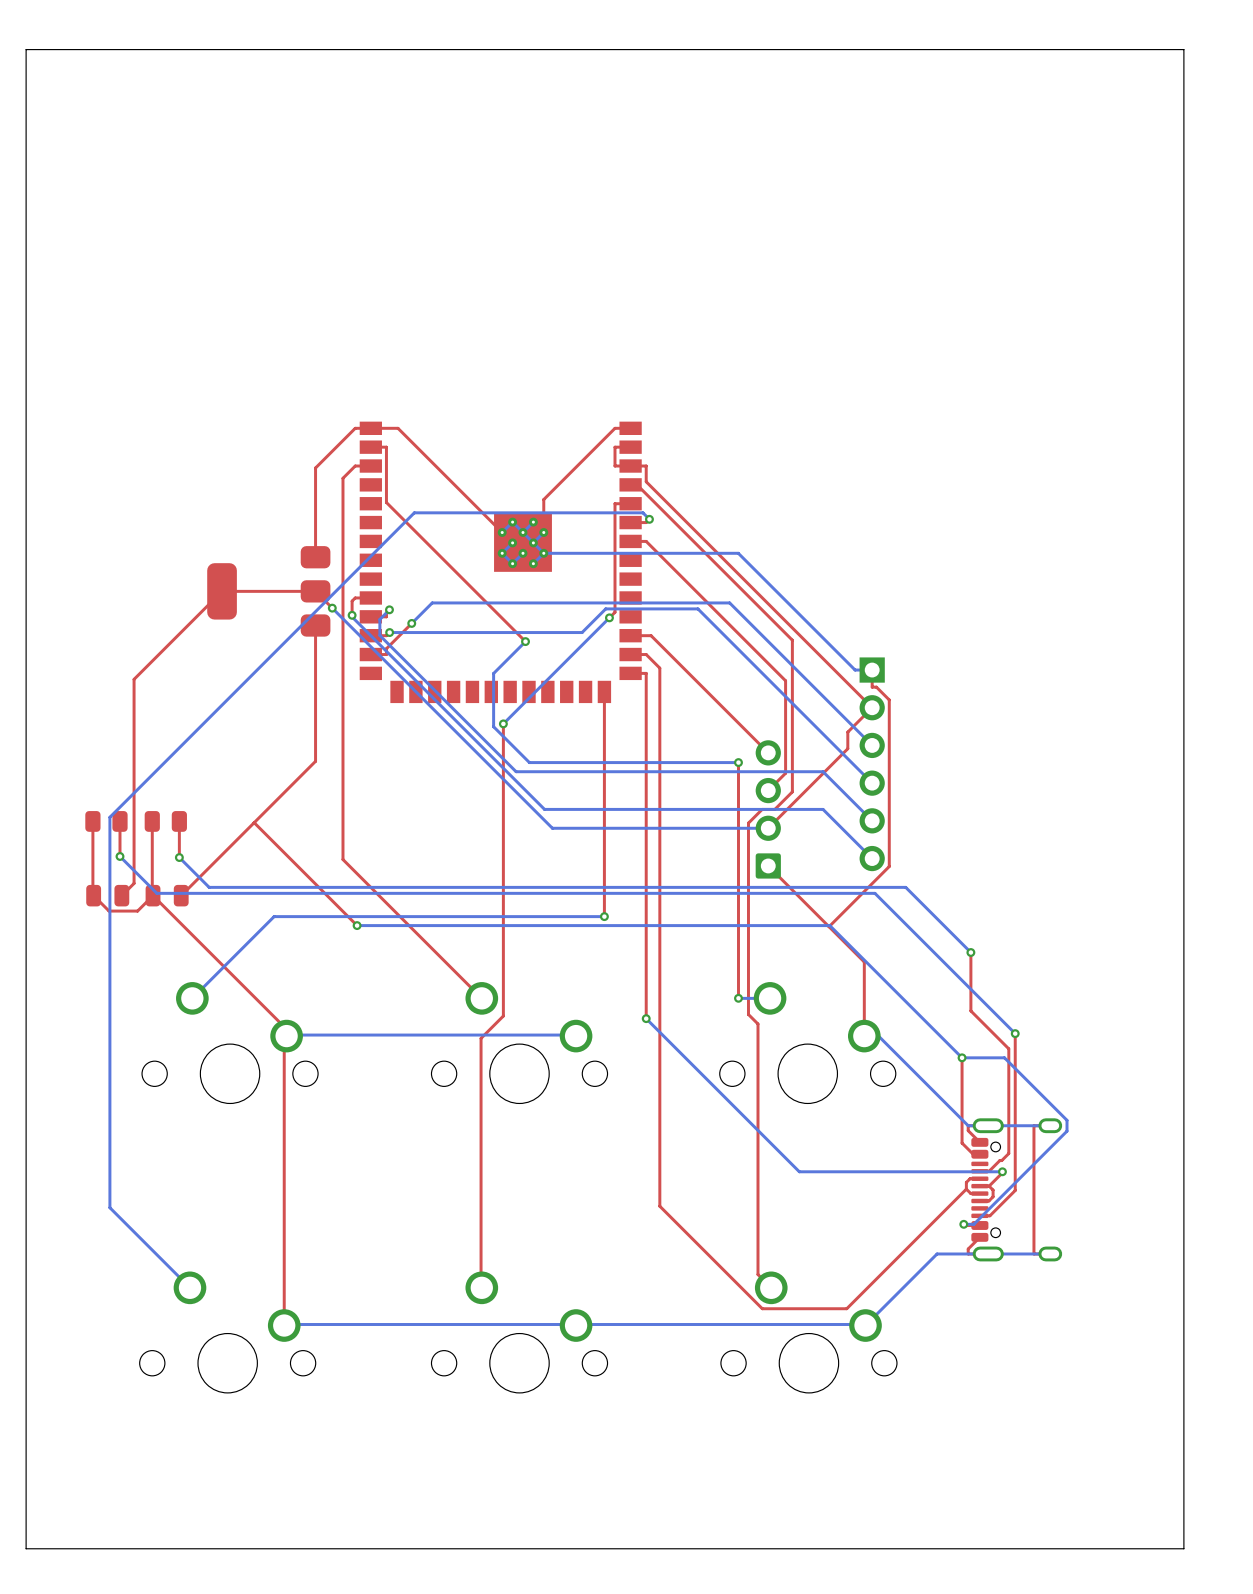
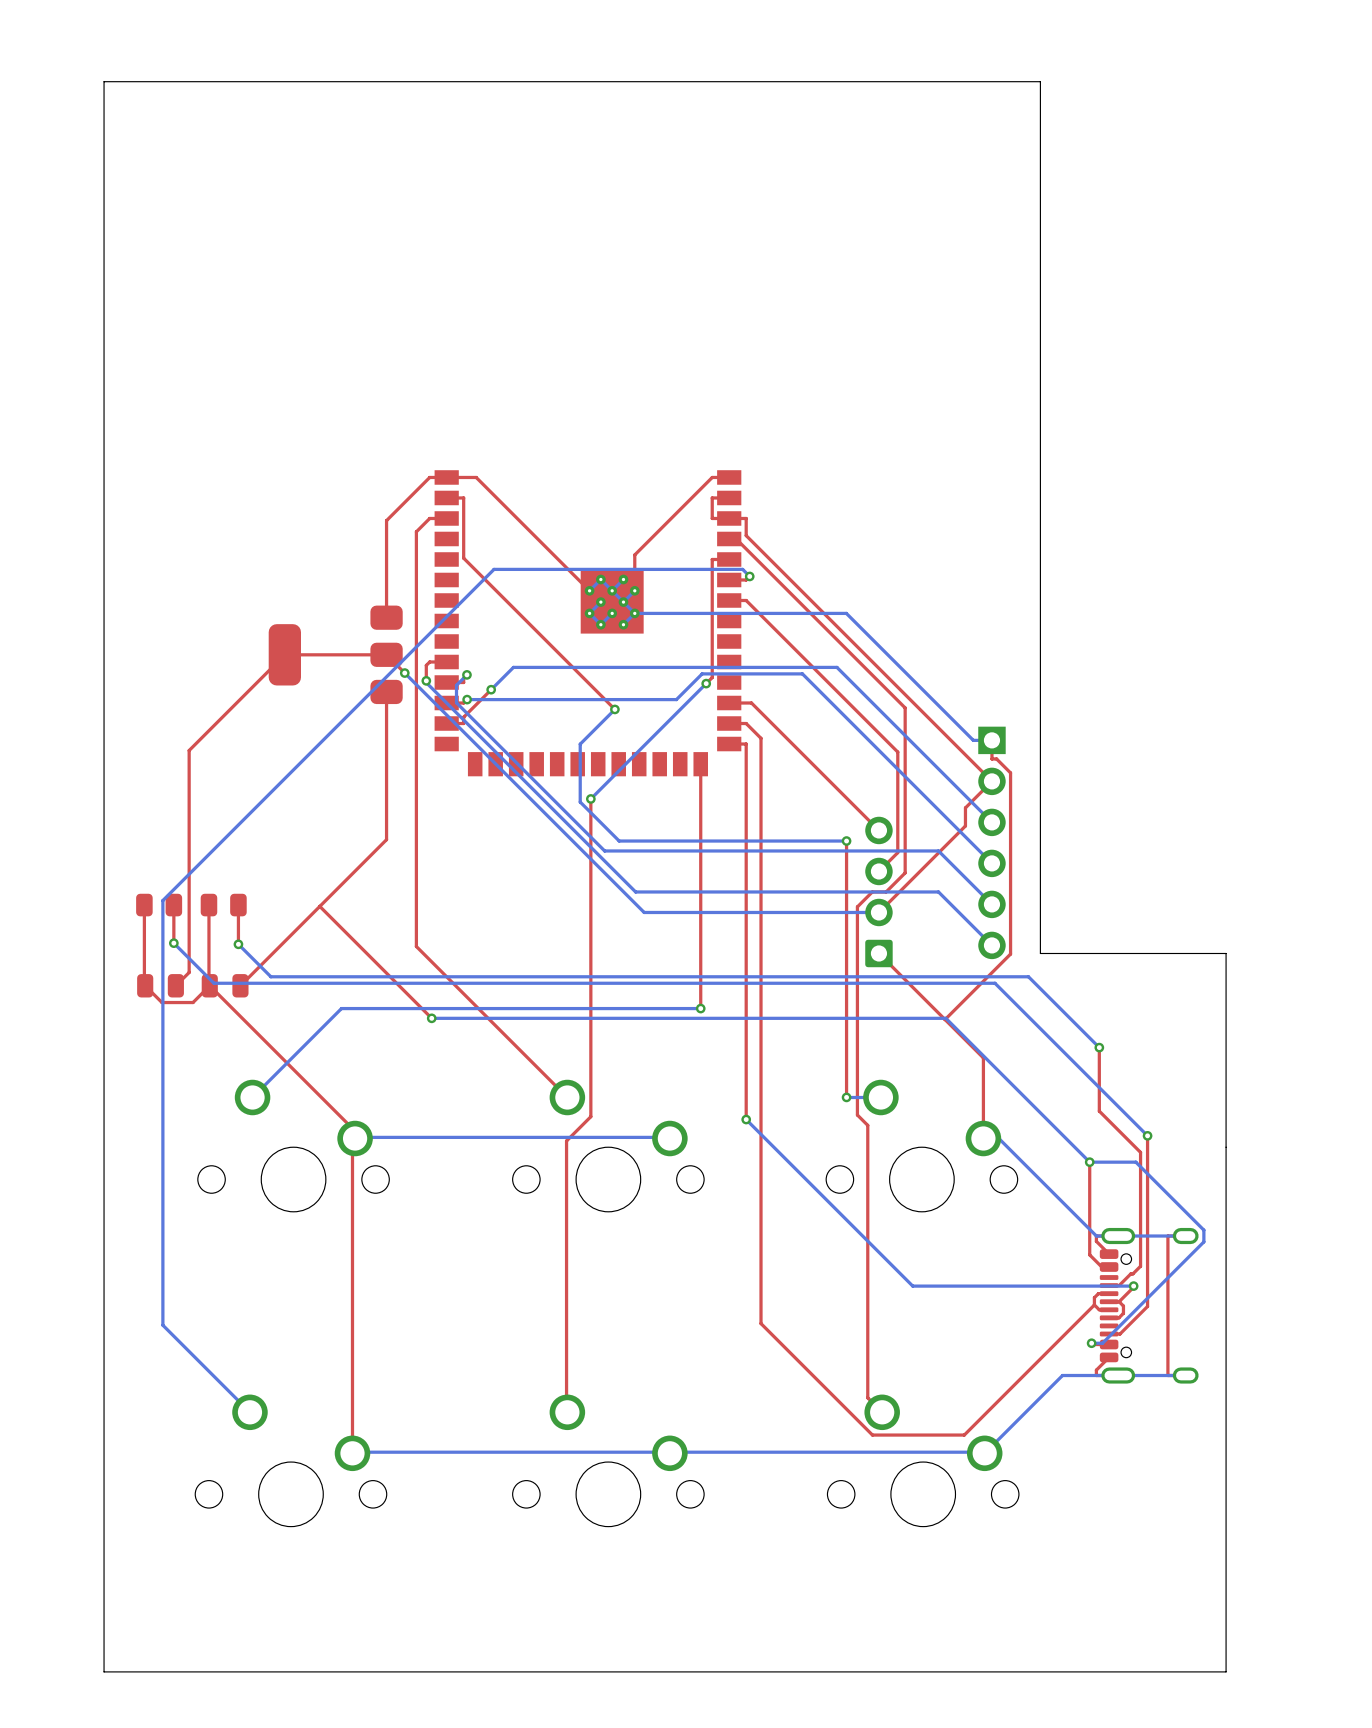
board edge: (1183, 49) (26, 49) (26, 1548) (1183, 1548) (1183, 49) -> (1040, 81) (1040, 953) (1226, 953) (1226, 1671) (104, 1671) (104, 81) (1040, 81)

